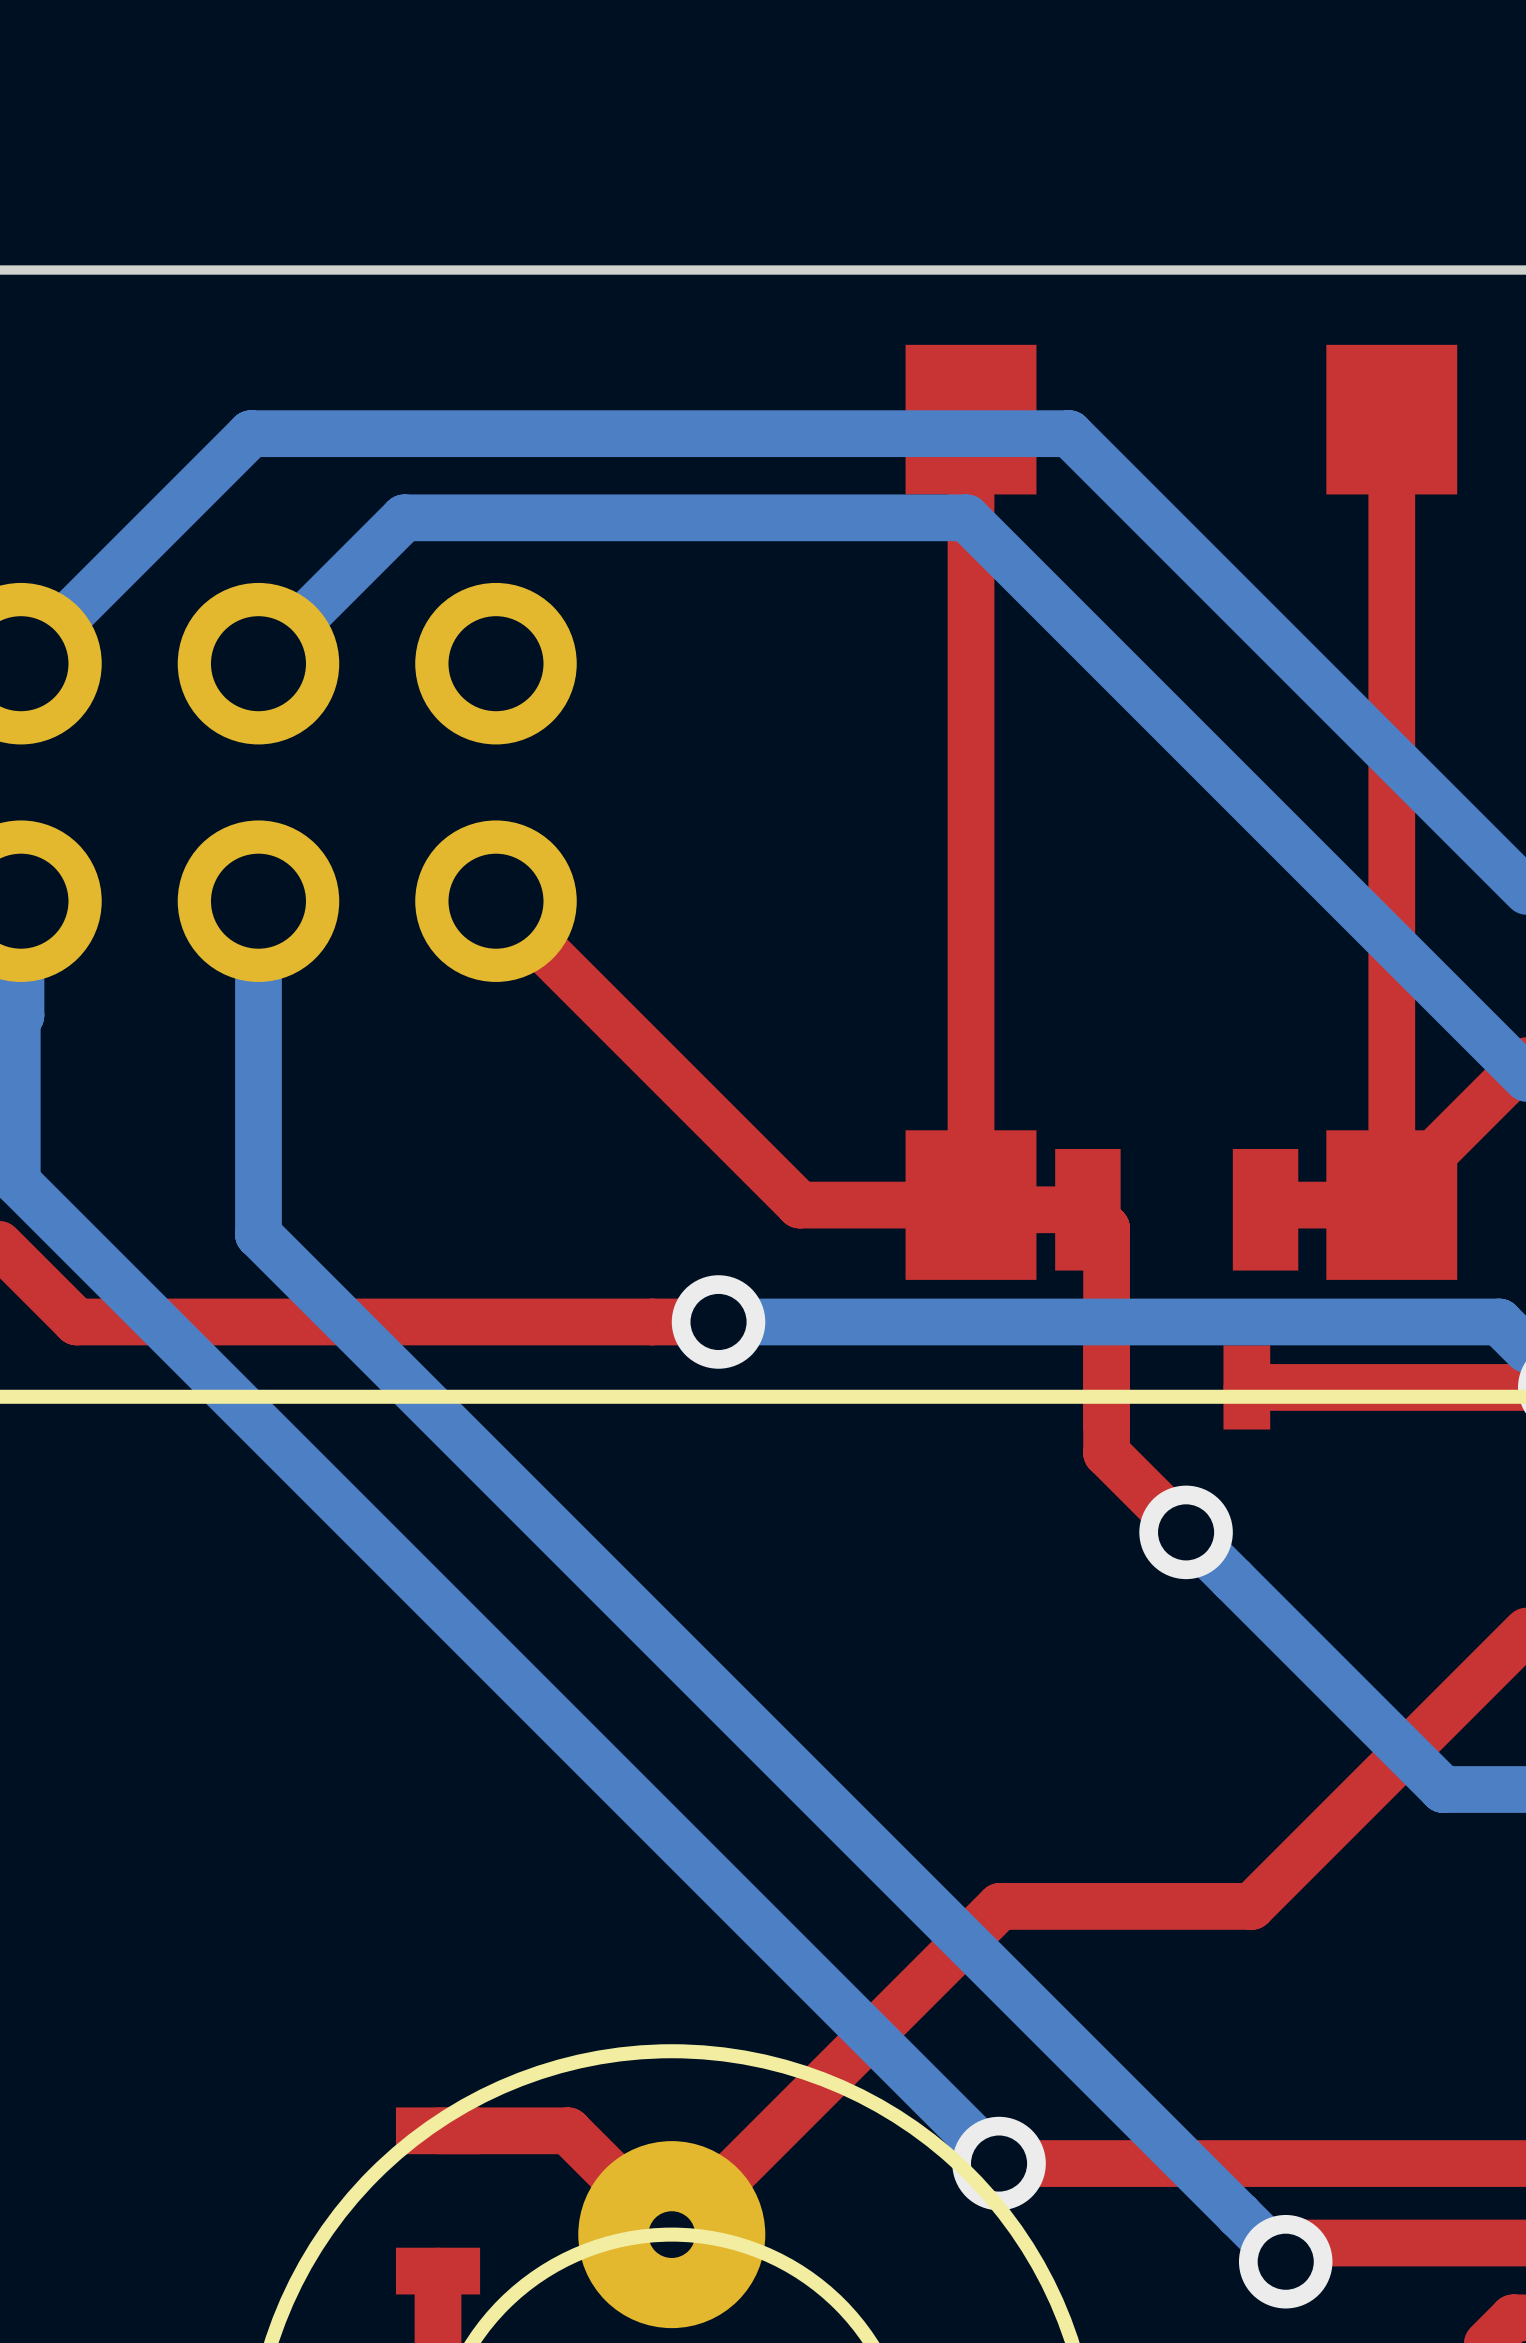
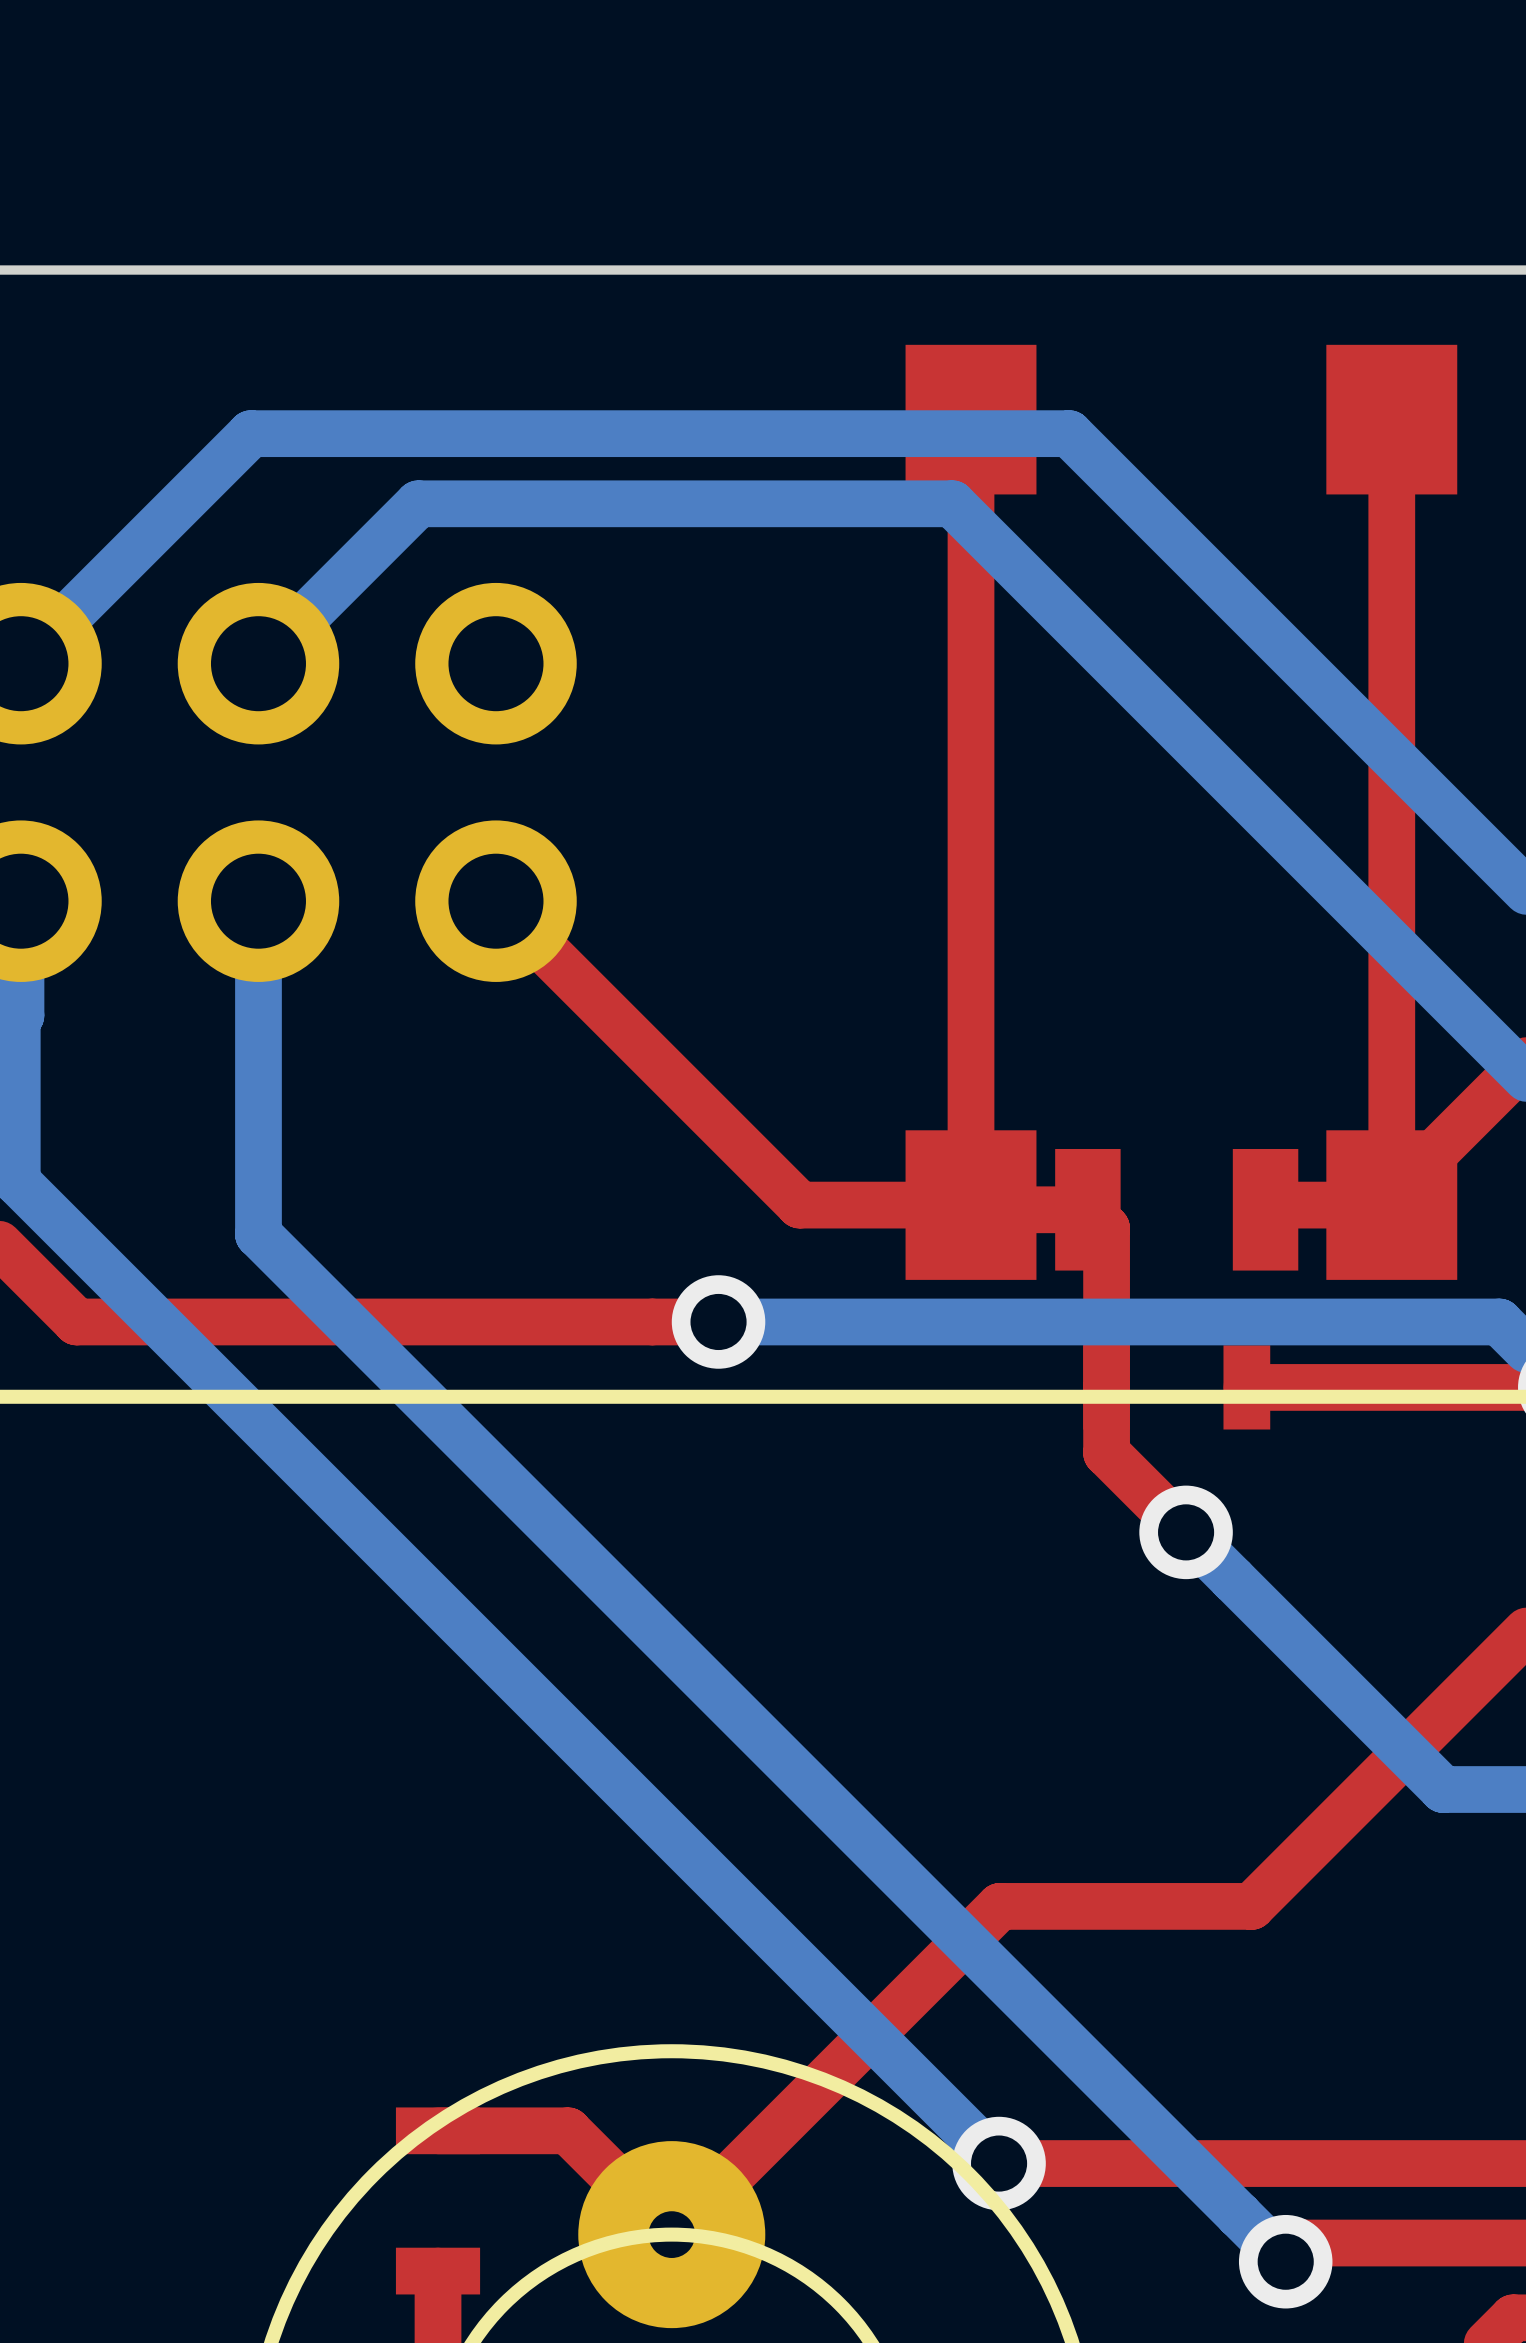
bottom track: (966, 517) (404, 517) -> (966, 517) (952, 503) (418, 503) (404, 517)

